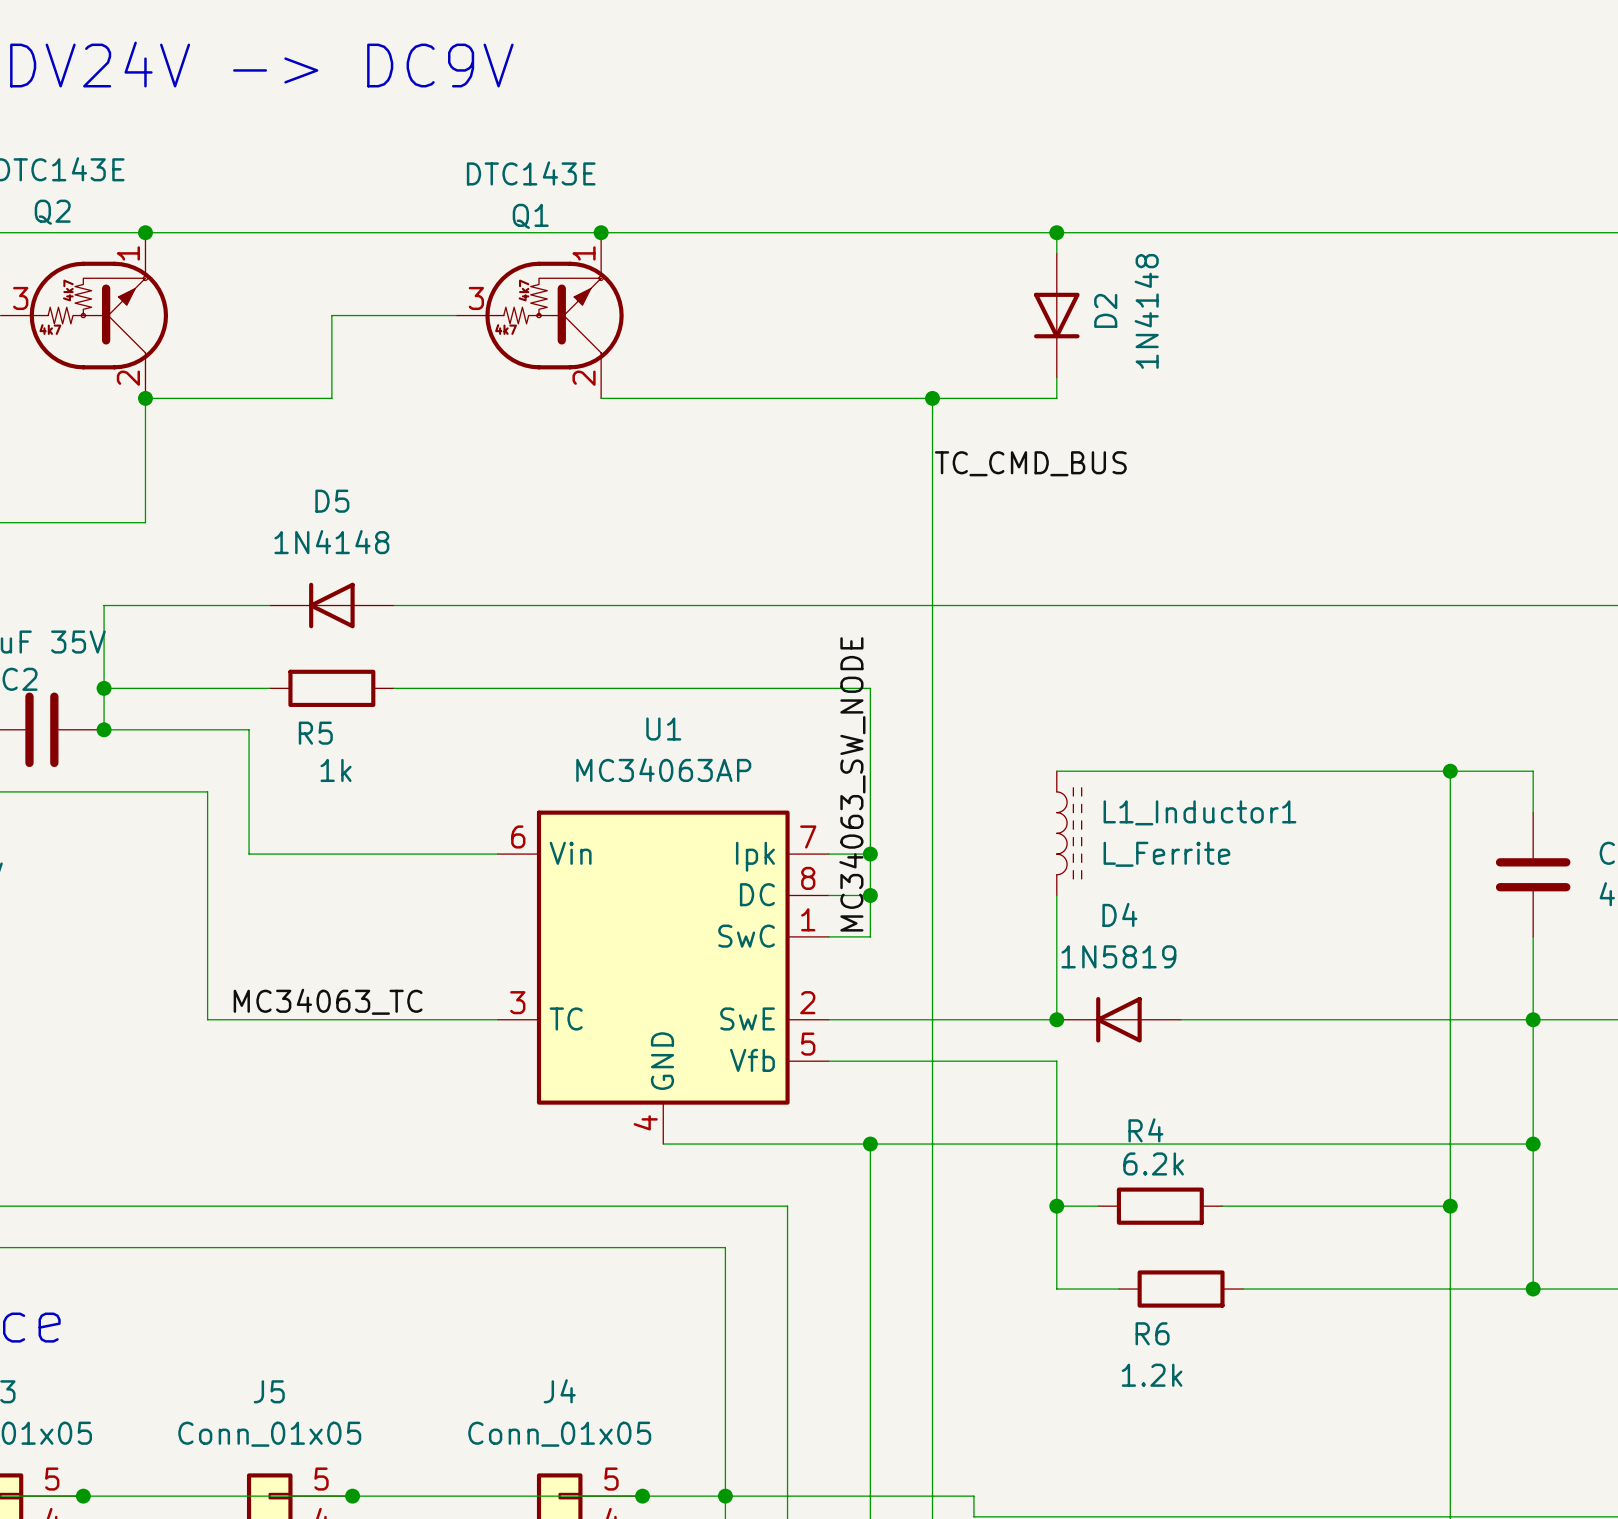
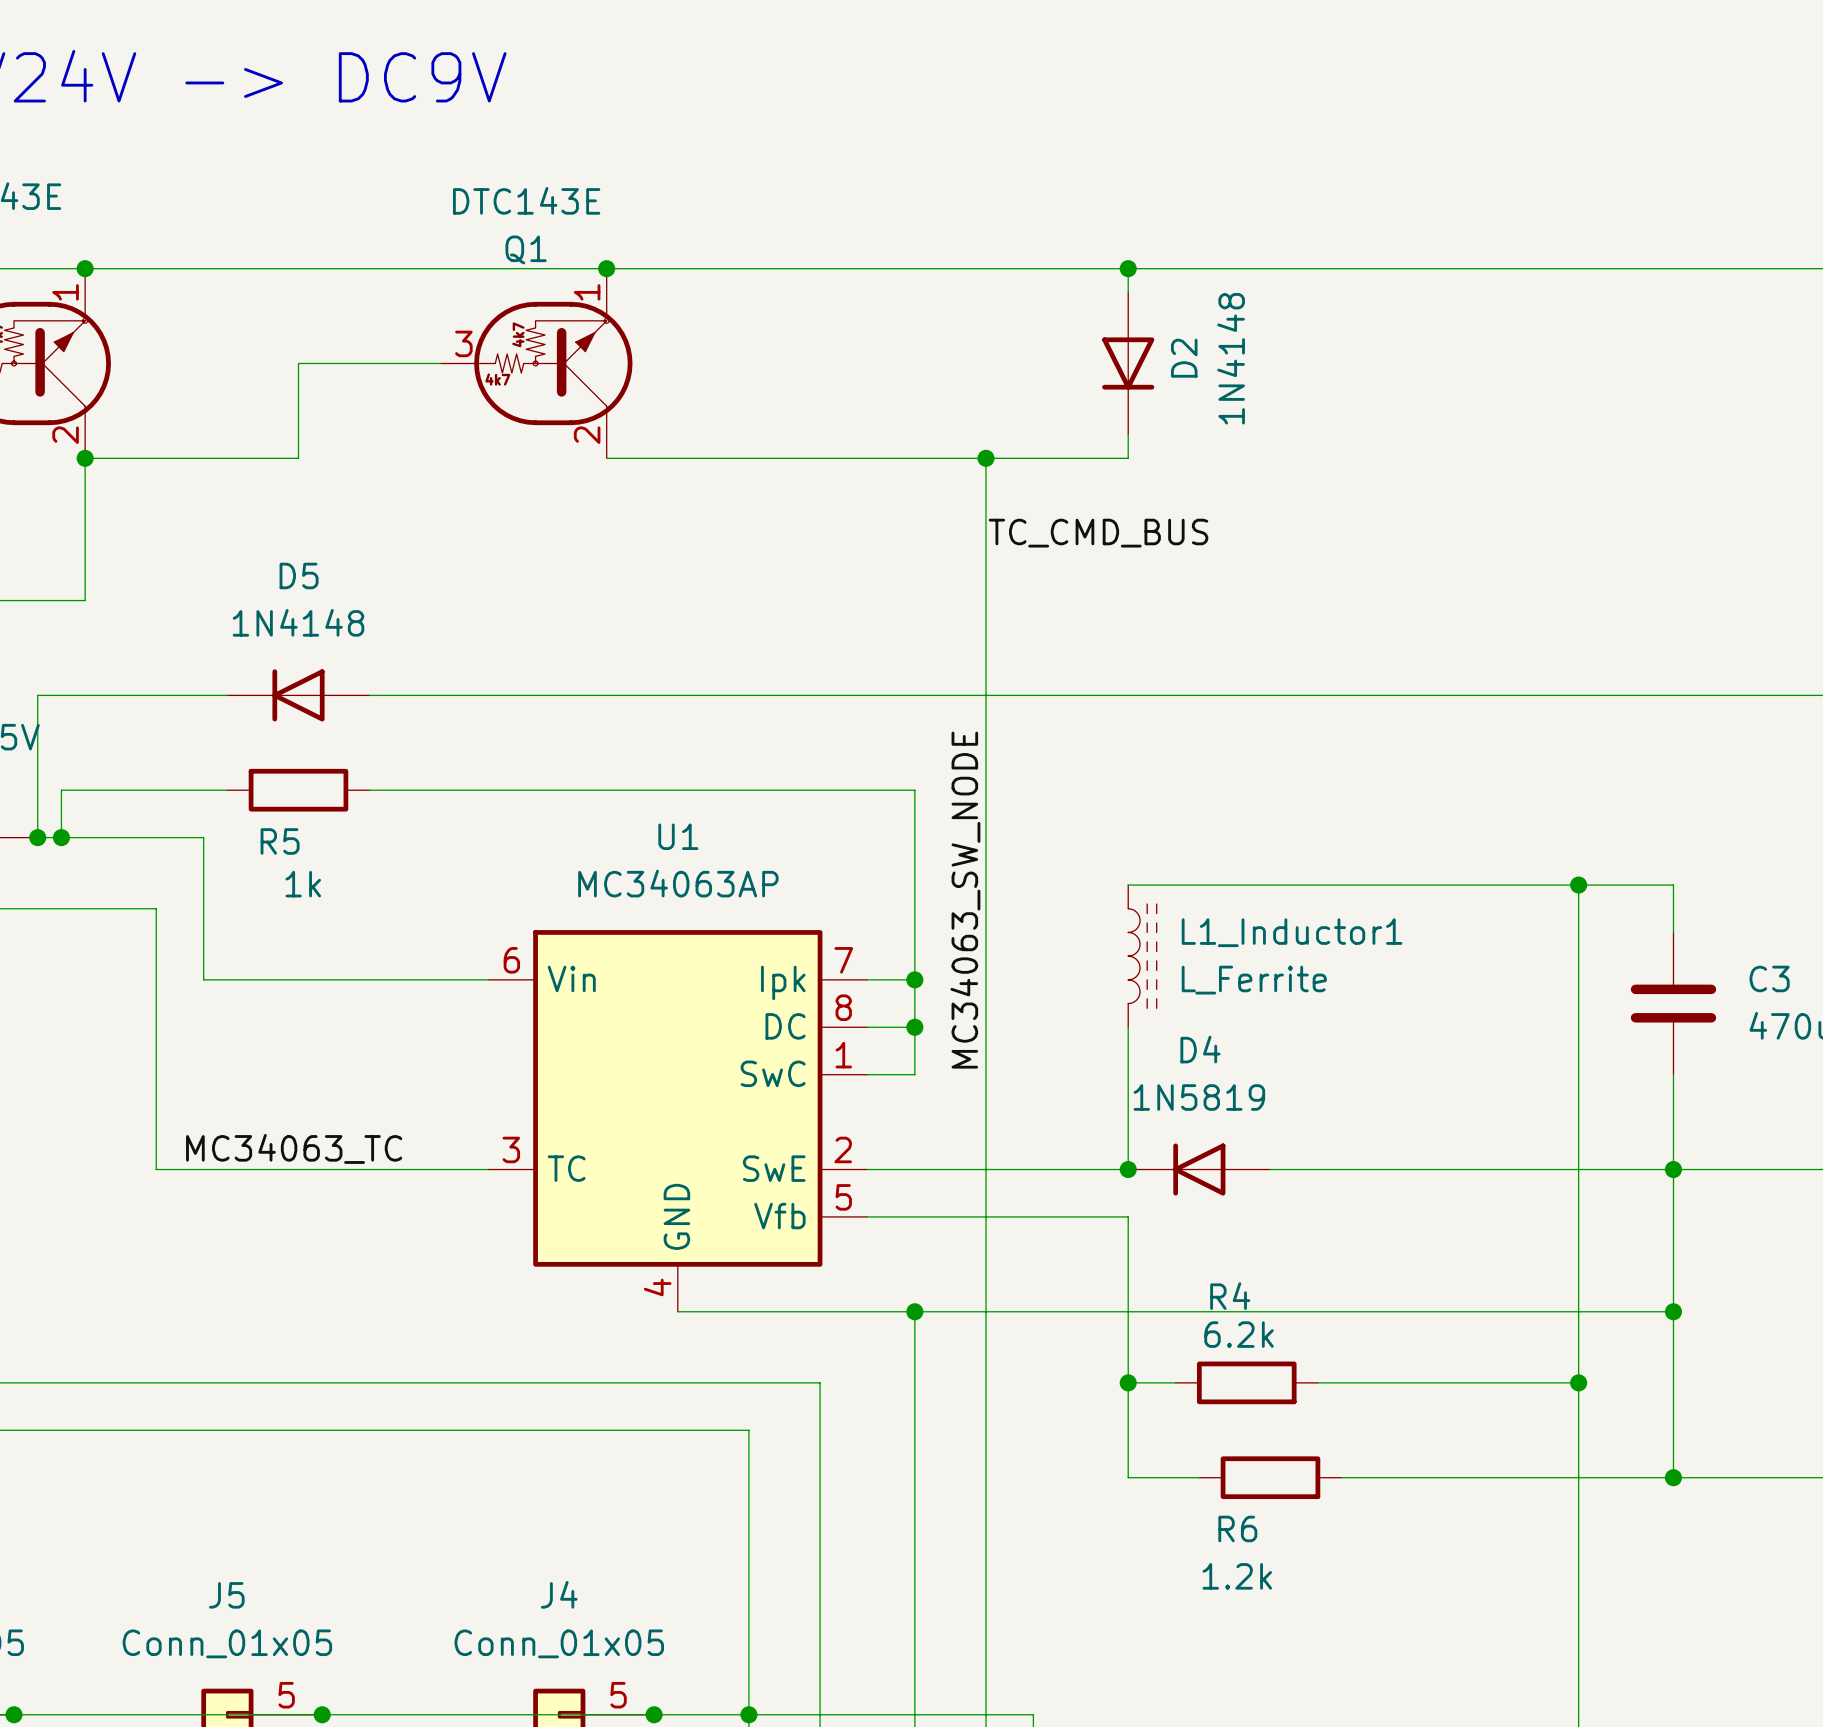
wire: (104, 688) (124, 688) -> (61, 837) (61, 790)
junction position: (104, 688) -> (61, 837)
label position: MC34063_SW_NODE (852, 784) -> MC34063_SW_NODE (965, 900)

